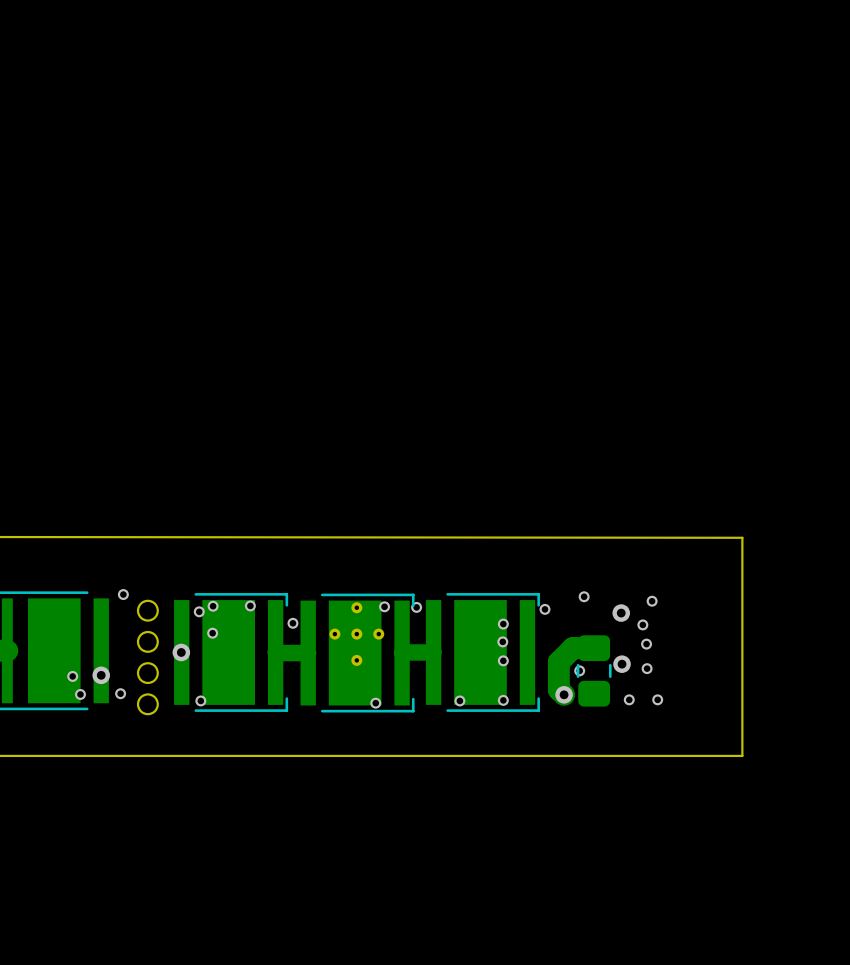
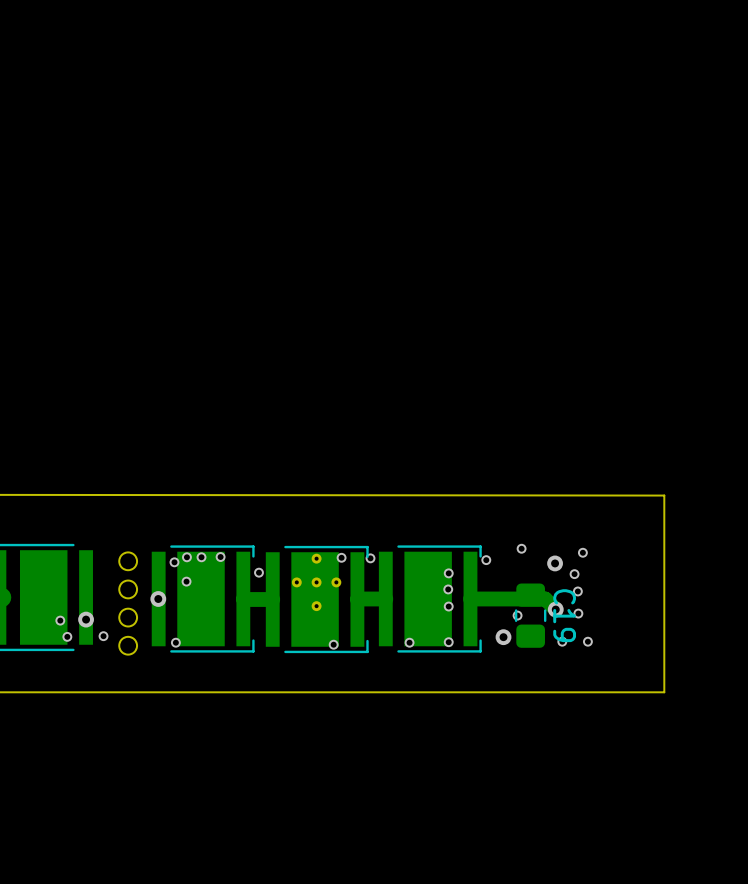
via position: (123, 594) -> (201, 557)
track: (595, 648) (572, 648) (558, 662) (558, 689) (564, 694) -> none
track: none -> (470, 598) (545, 598) (555, 609)
C19 name: none -> C19 (564, 615)

